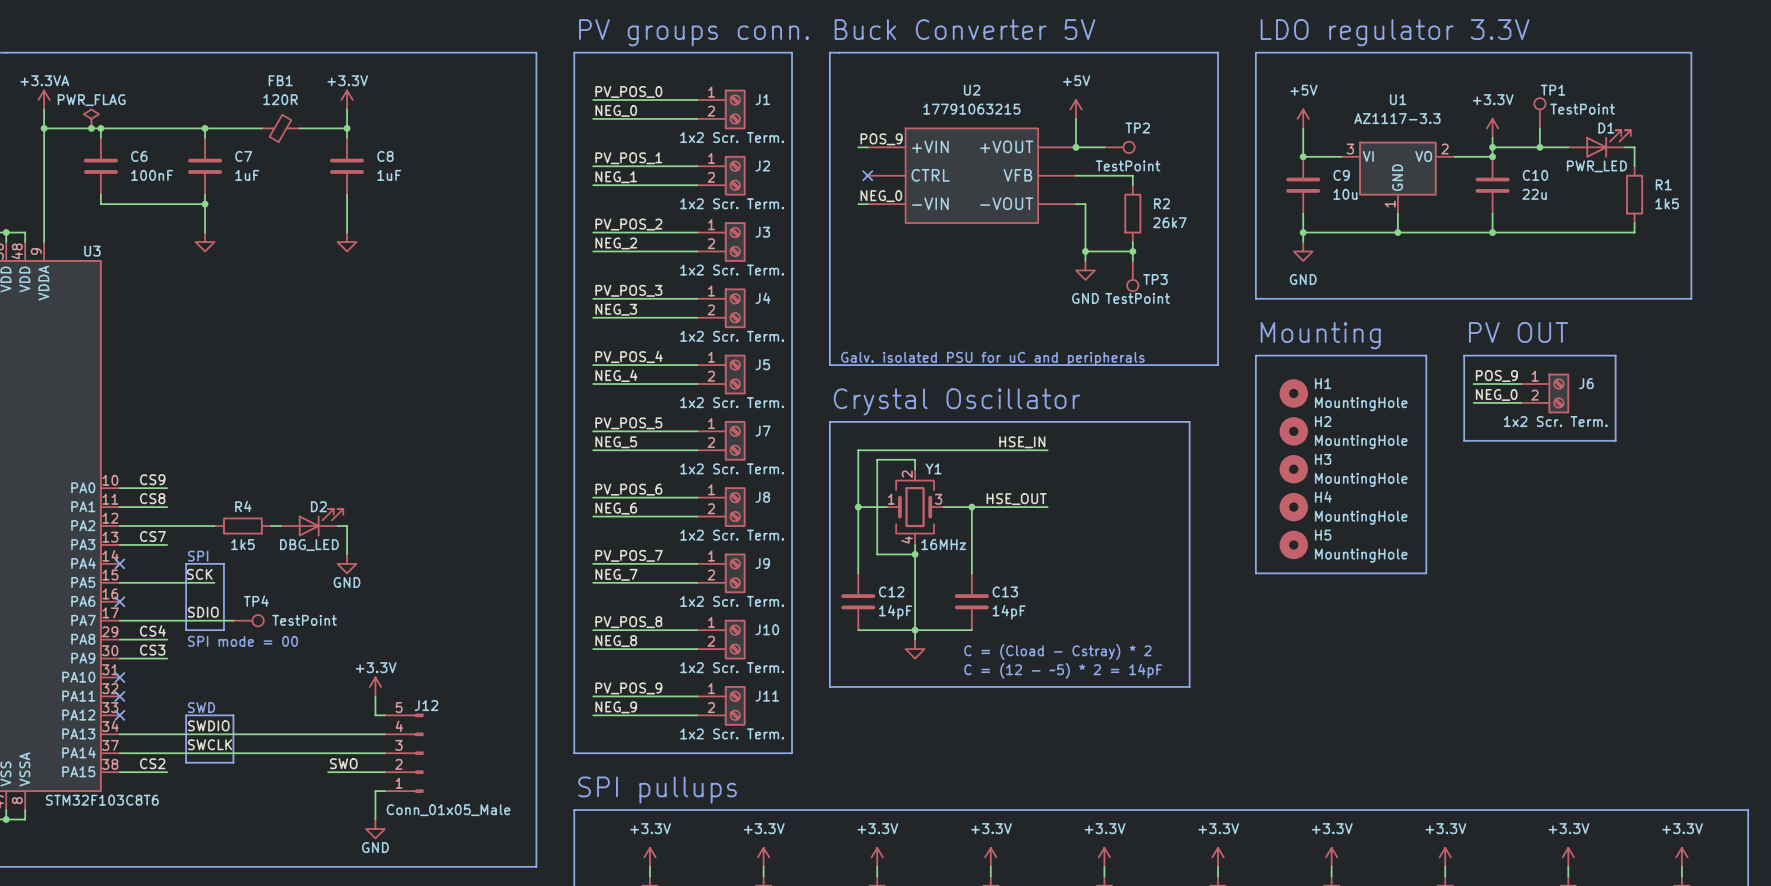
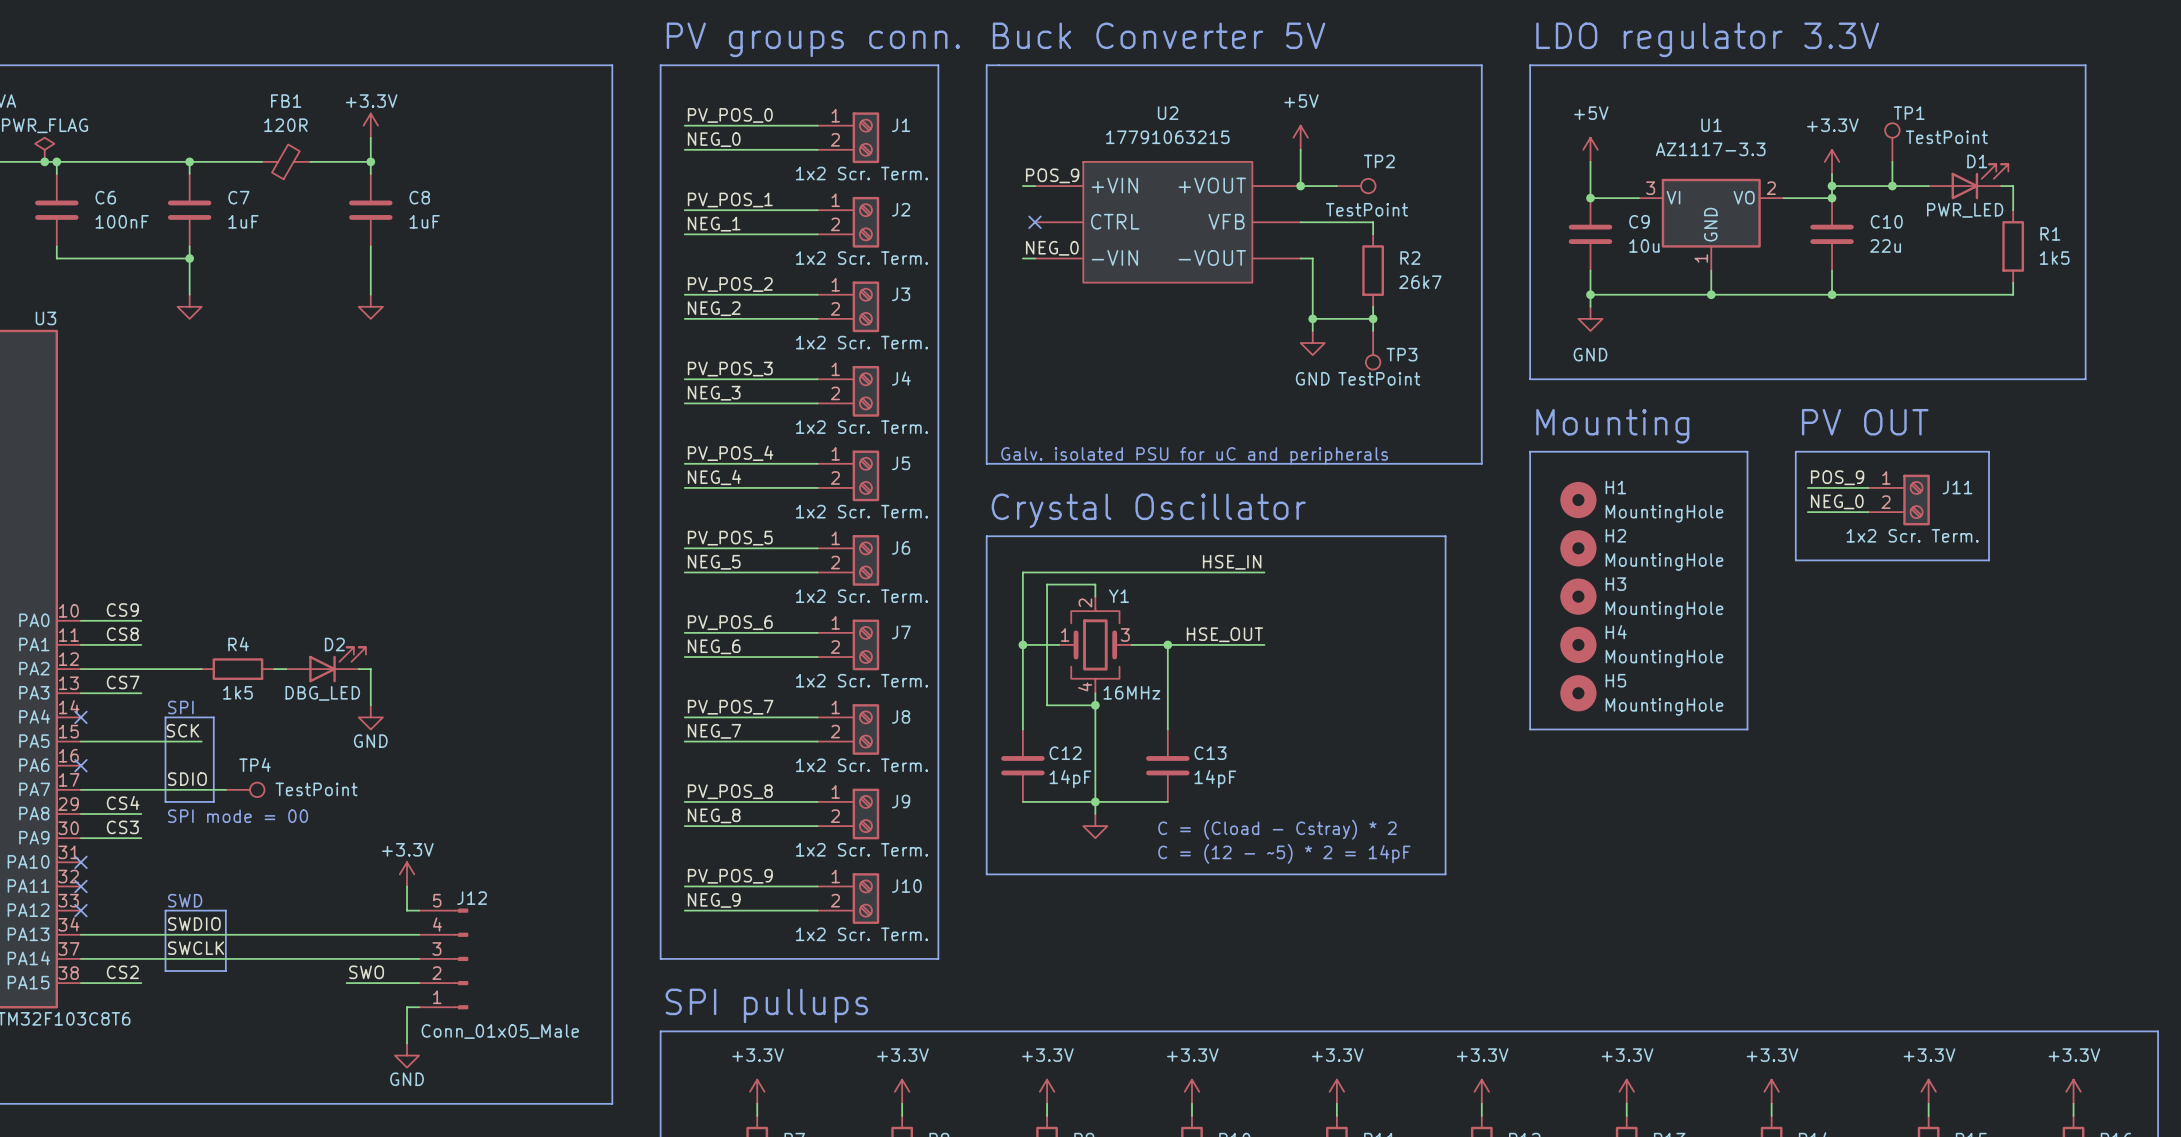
J6 name: J6 (1586, 383) -> J11 (1957, 487)
J7 name: J7 (763, 431) -> J6 (901, 547)
J8 name: J8 (762, 497) -> J7 (901, 632)
J9 name: J9 (762, 563) -> J8 (901, 716)
J10 name: J10 (767, 629) -> J9 (901, 801)
J11 name: J11 (767, 696) -> J10 (906, 886)

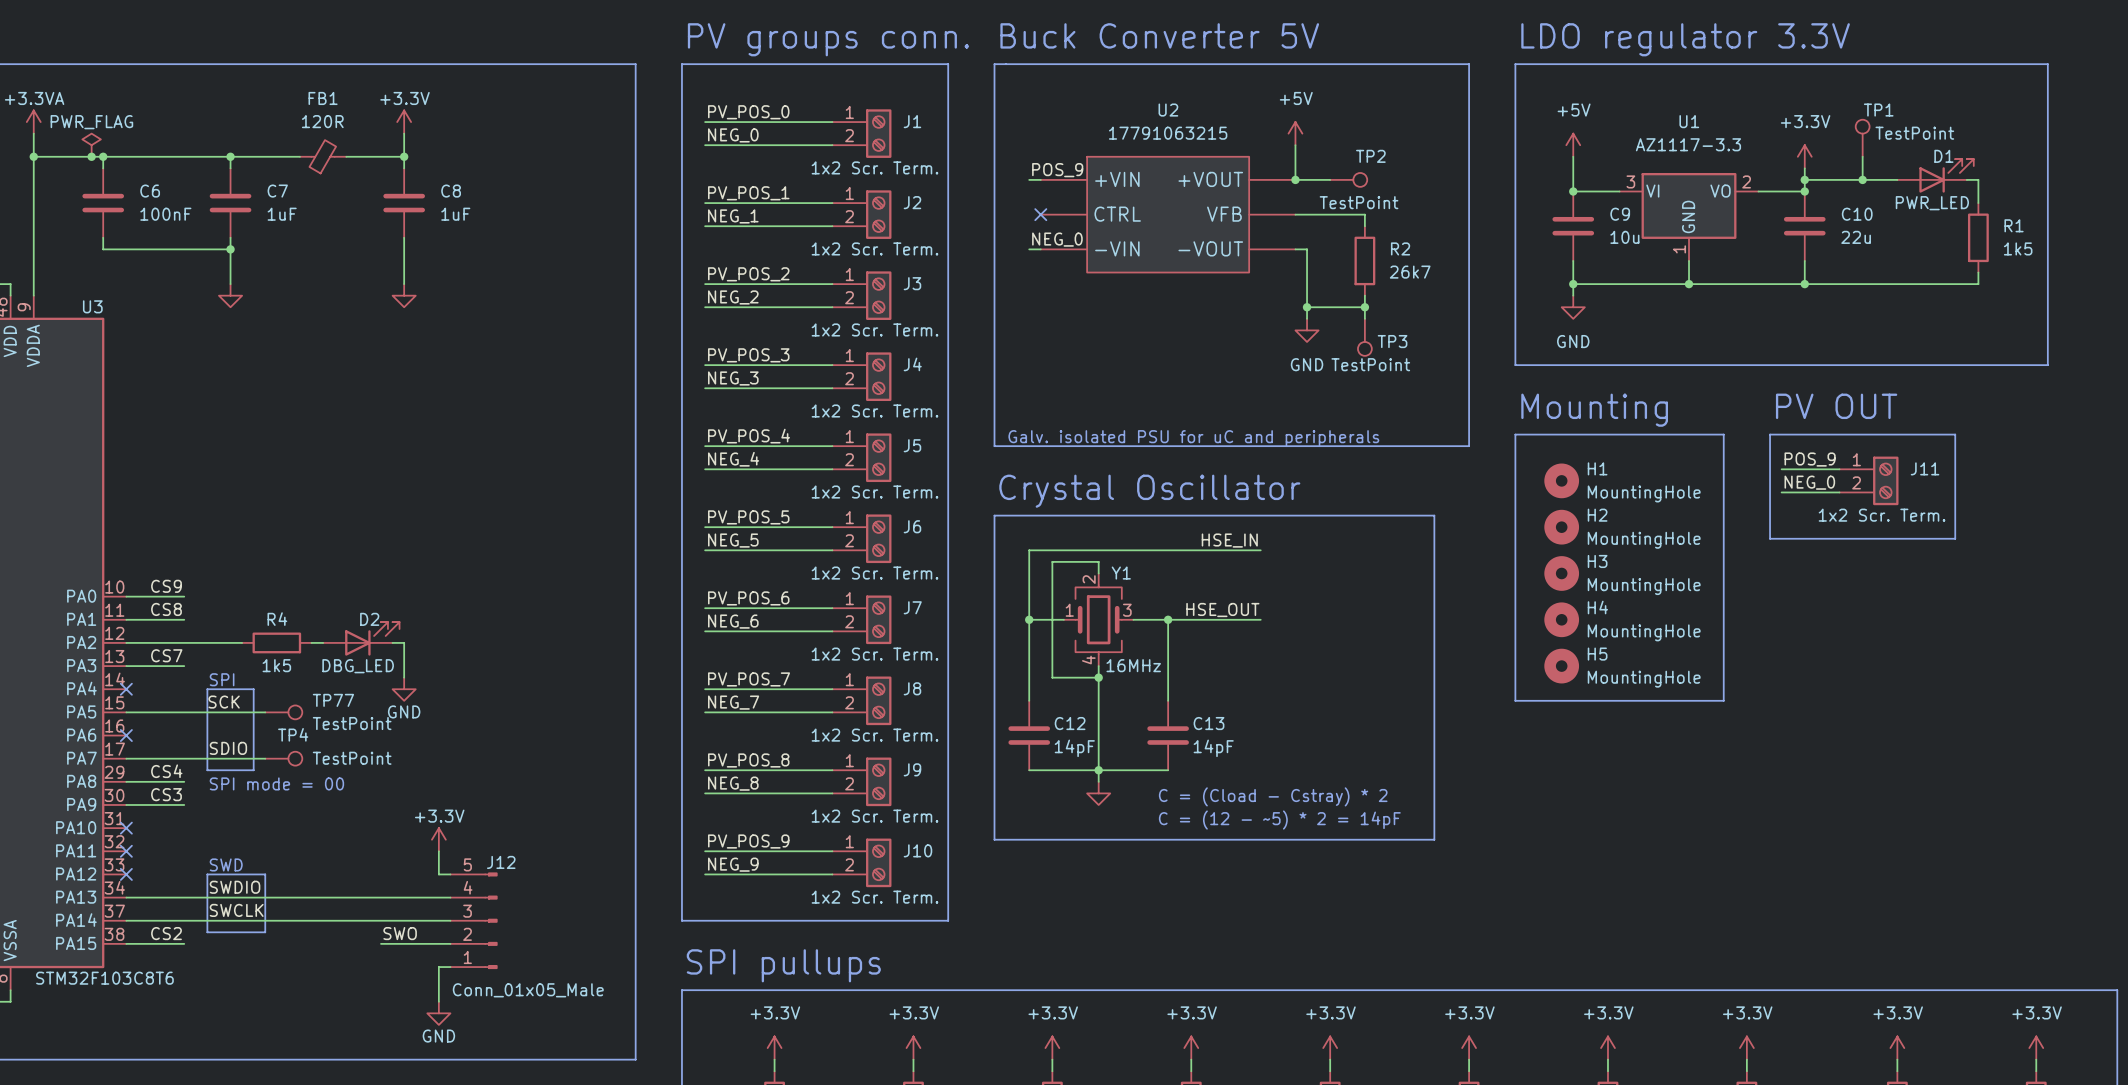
wire: none -> (242, 712) (265, 712)
TP77: none -> TestPoint (283, 712)

